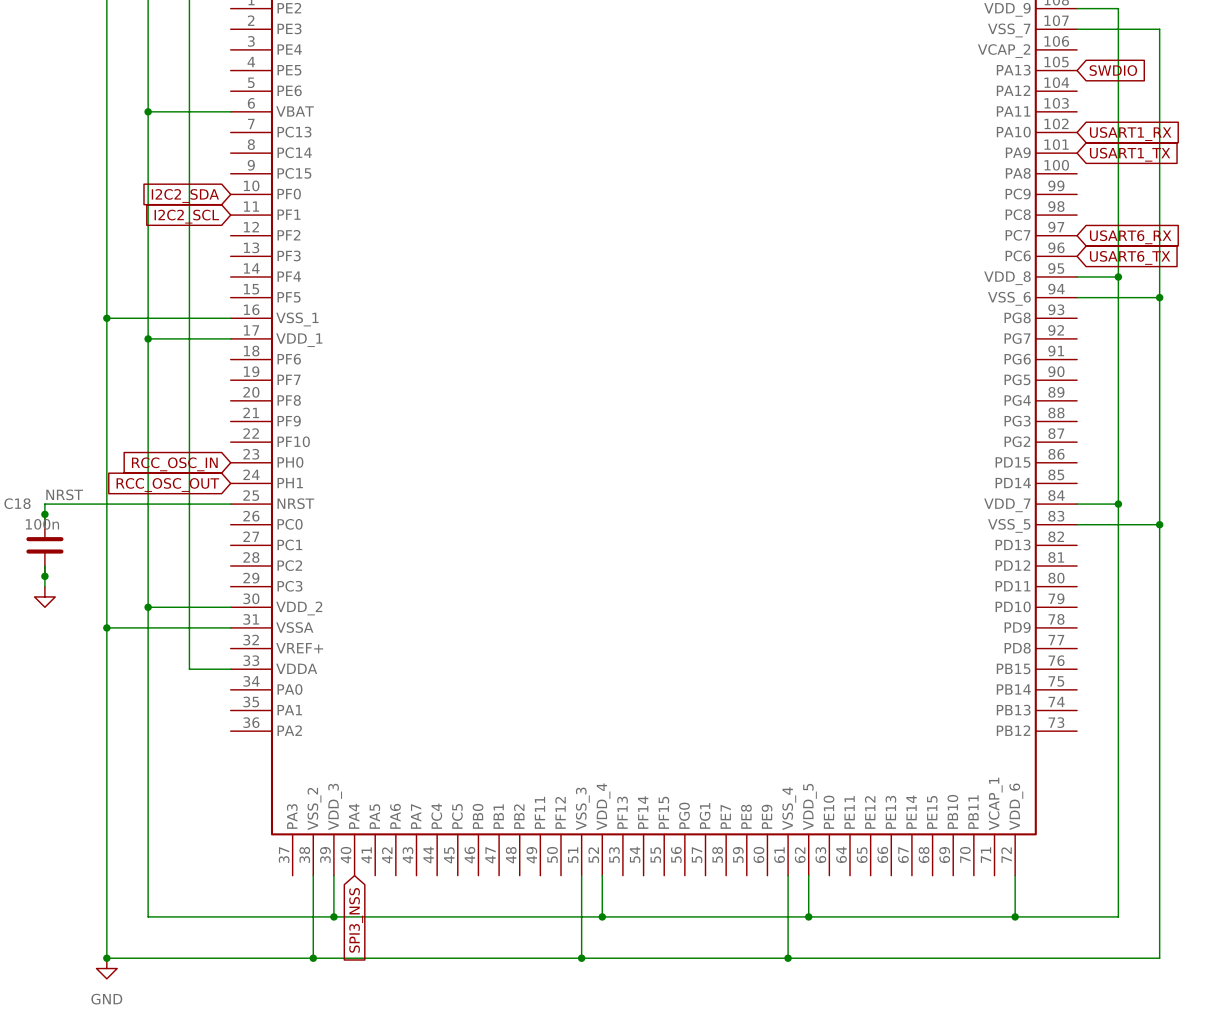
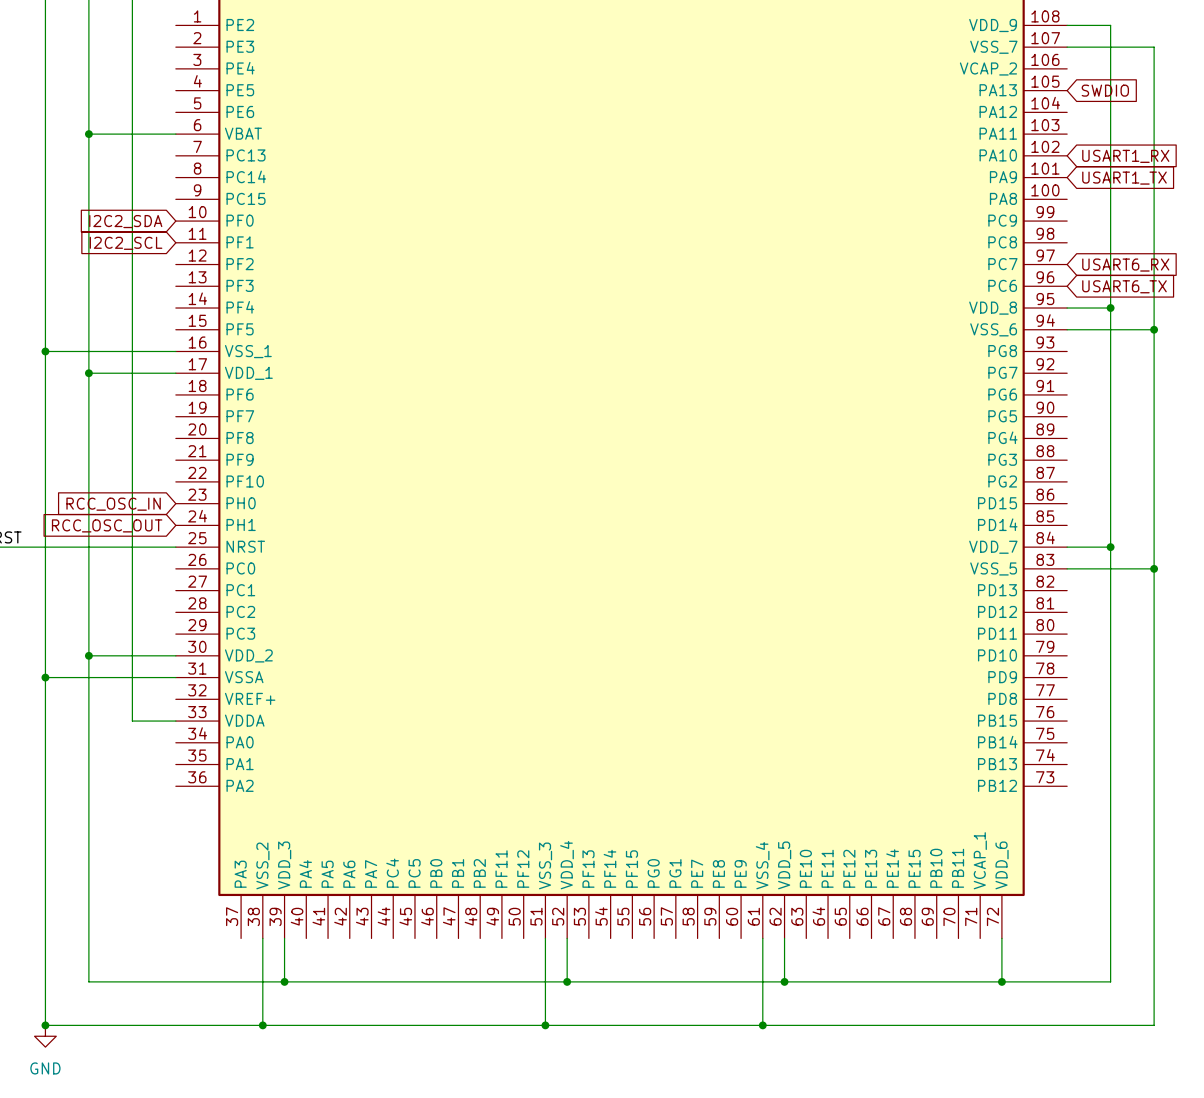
global label: SPI3_NSS (356, 920) -> none

